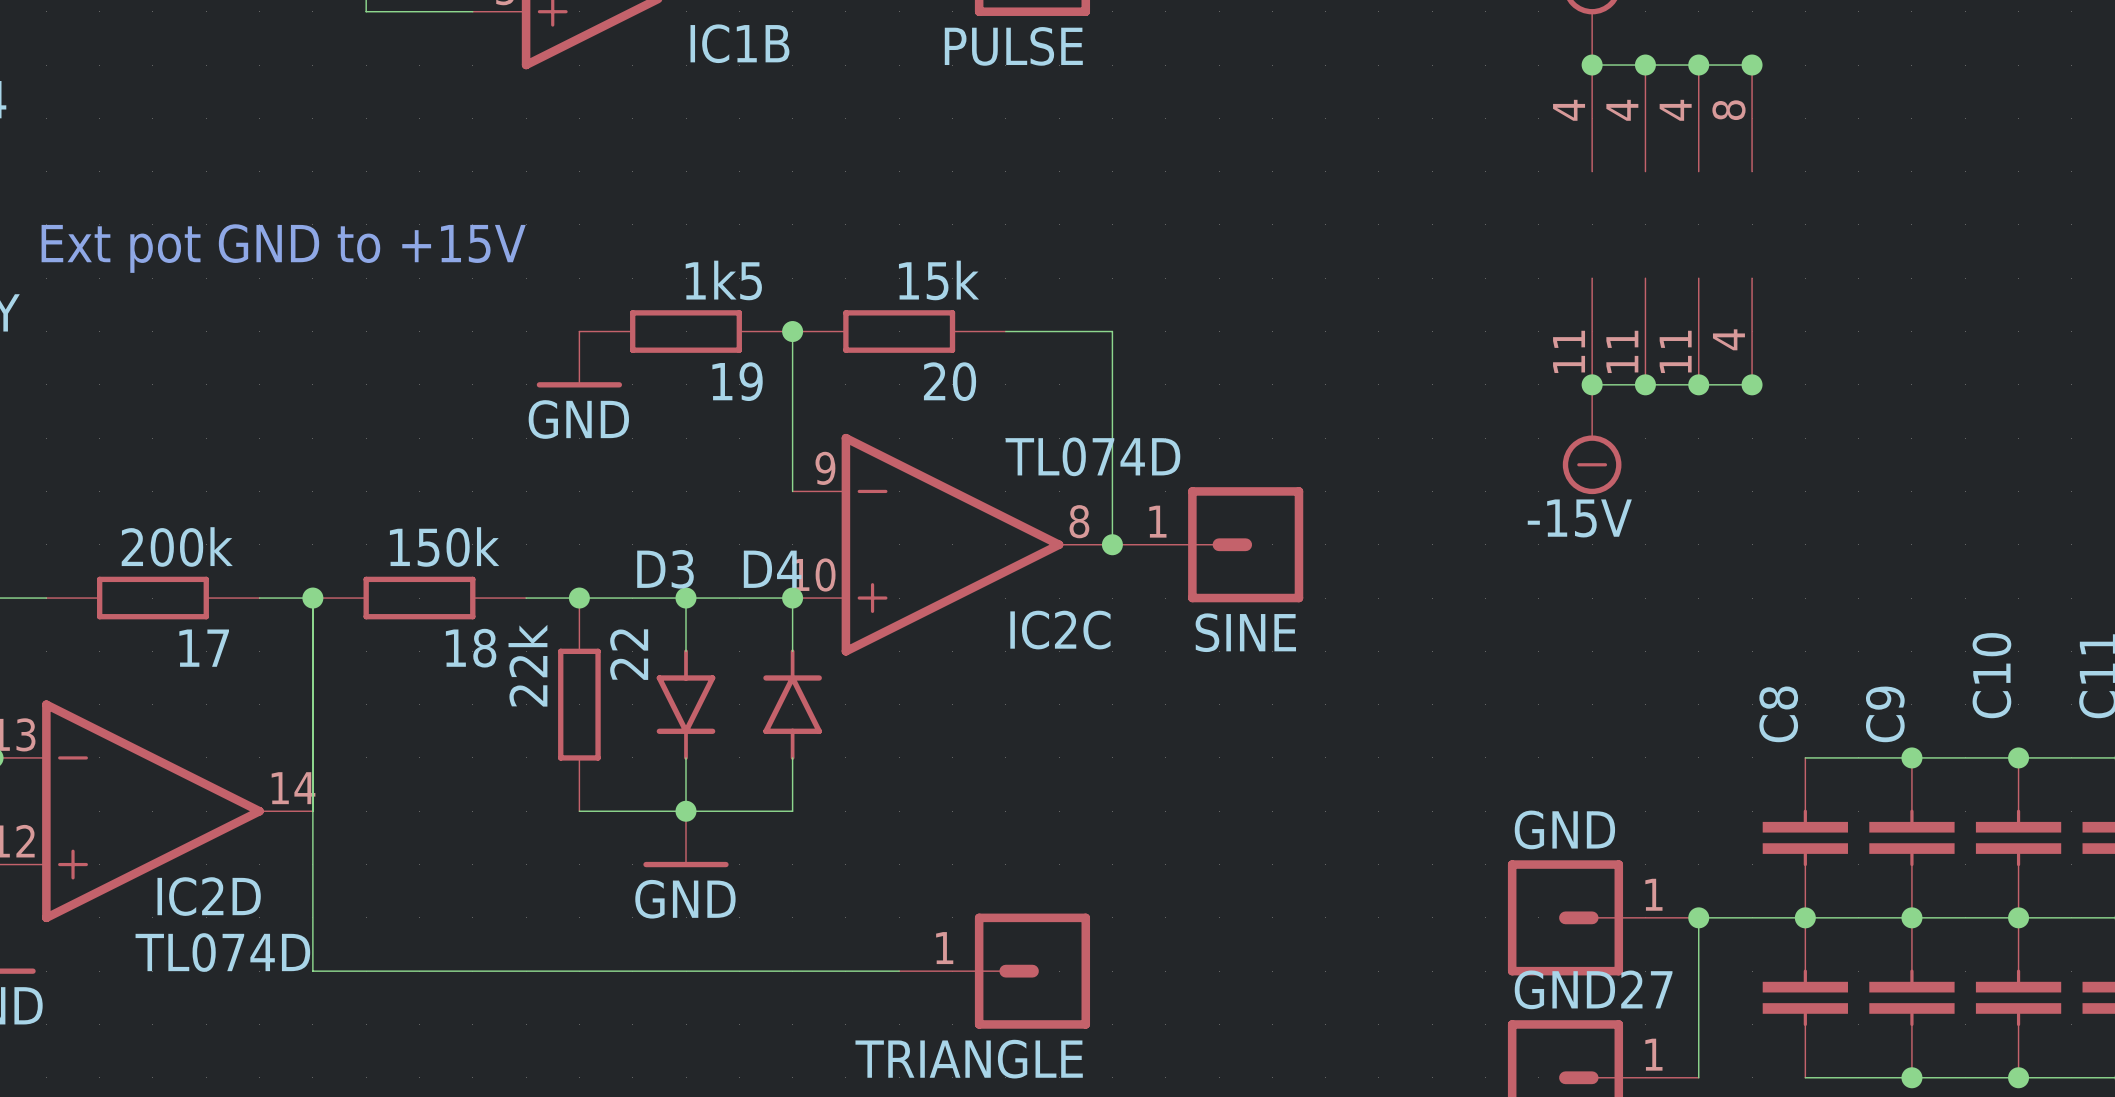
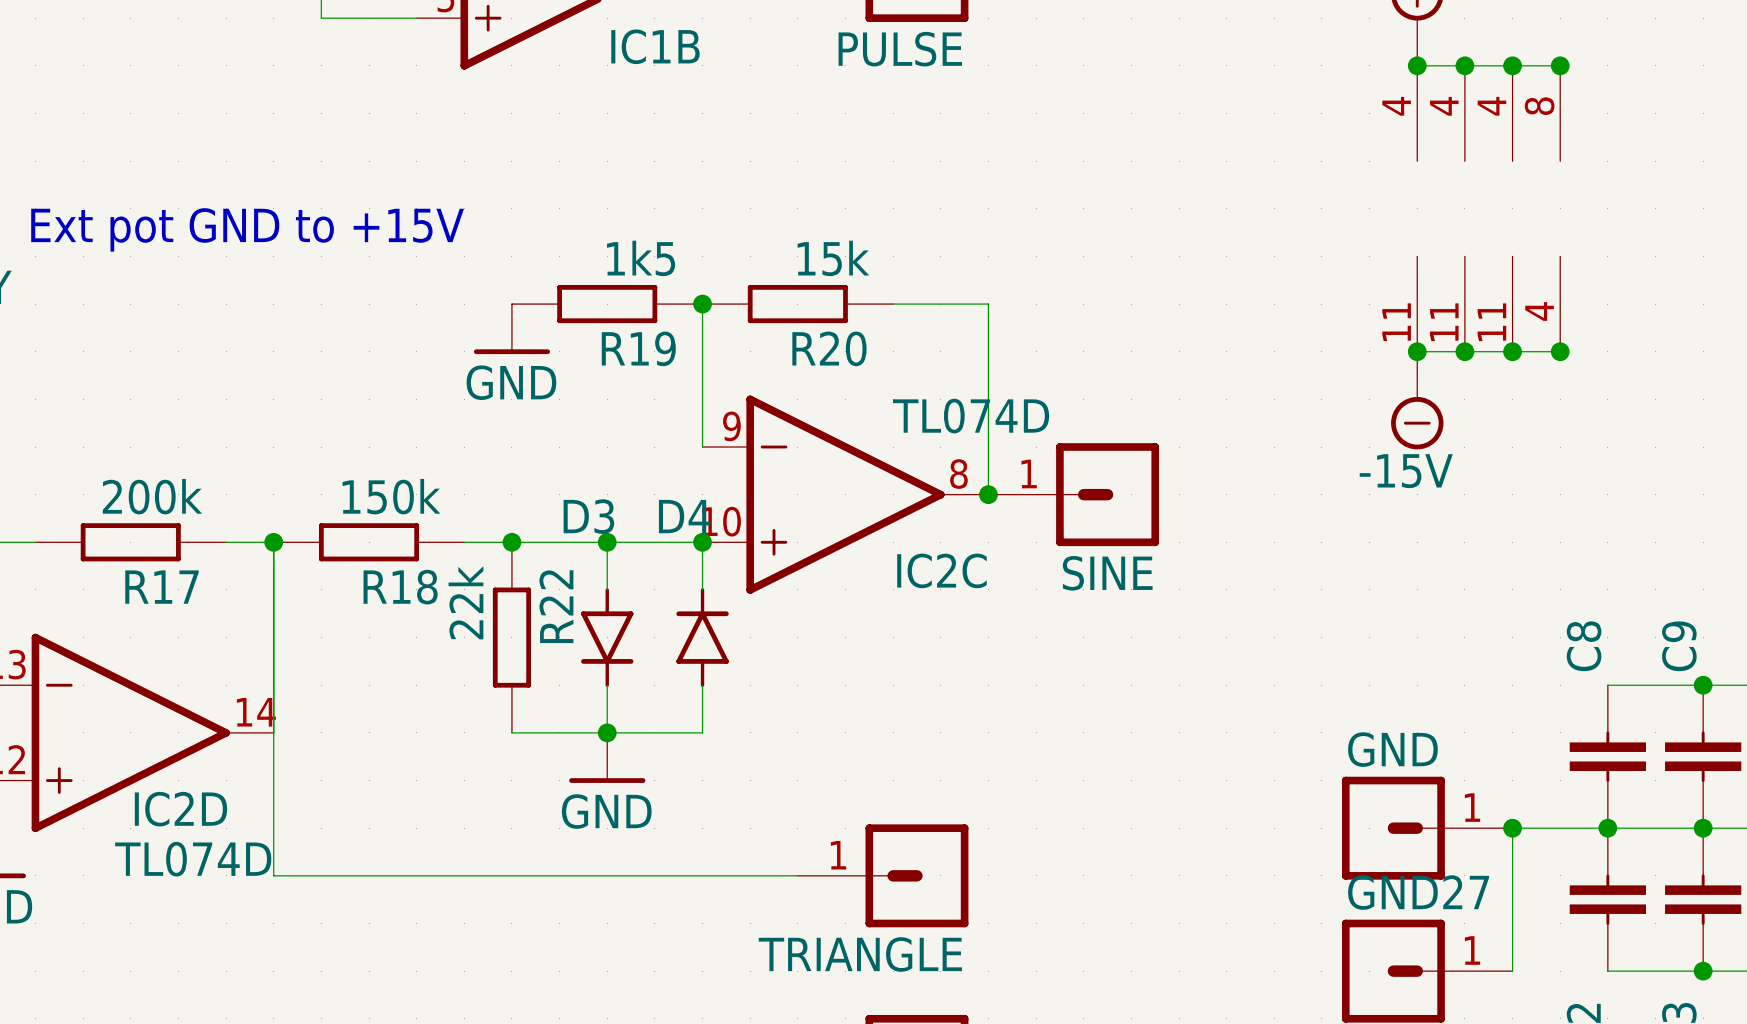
19 name: 19 (737, 381) -> R19 (638, 348)
20 name: 20 (950, 381) -> R20 (829, 348)
17 name: 17 (204, 648) -> R17 (162, 587)
18 name: 18 (471, 648) -> R18 (400, 587)
22 name: 22 (629, 654) -> R22 (556, 606)

